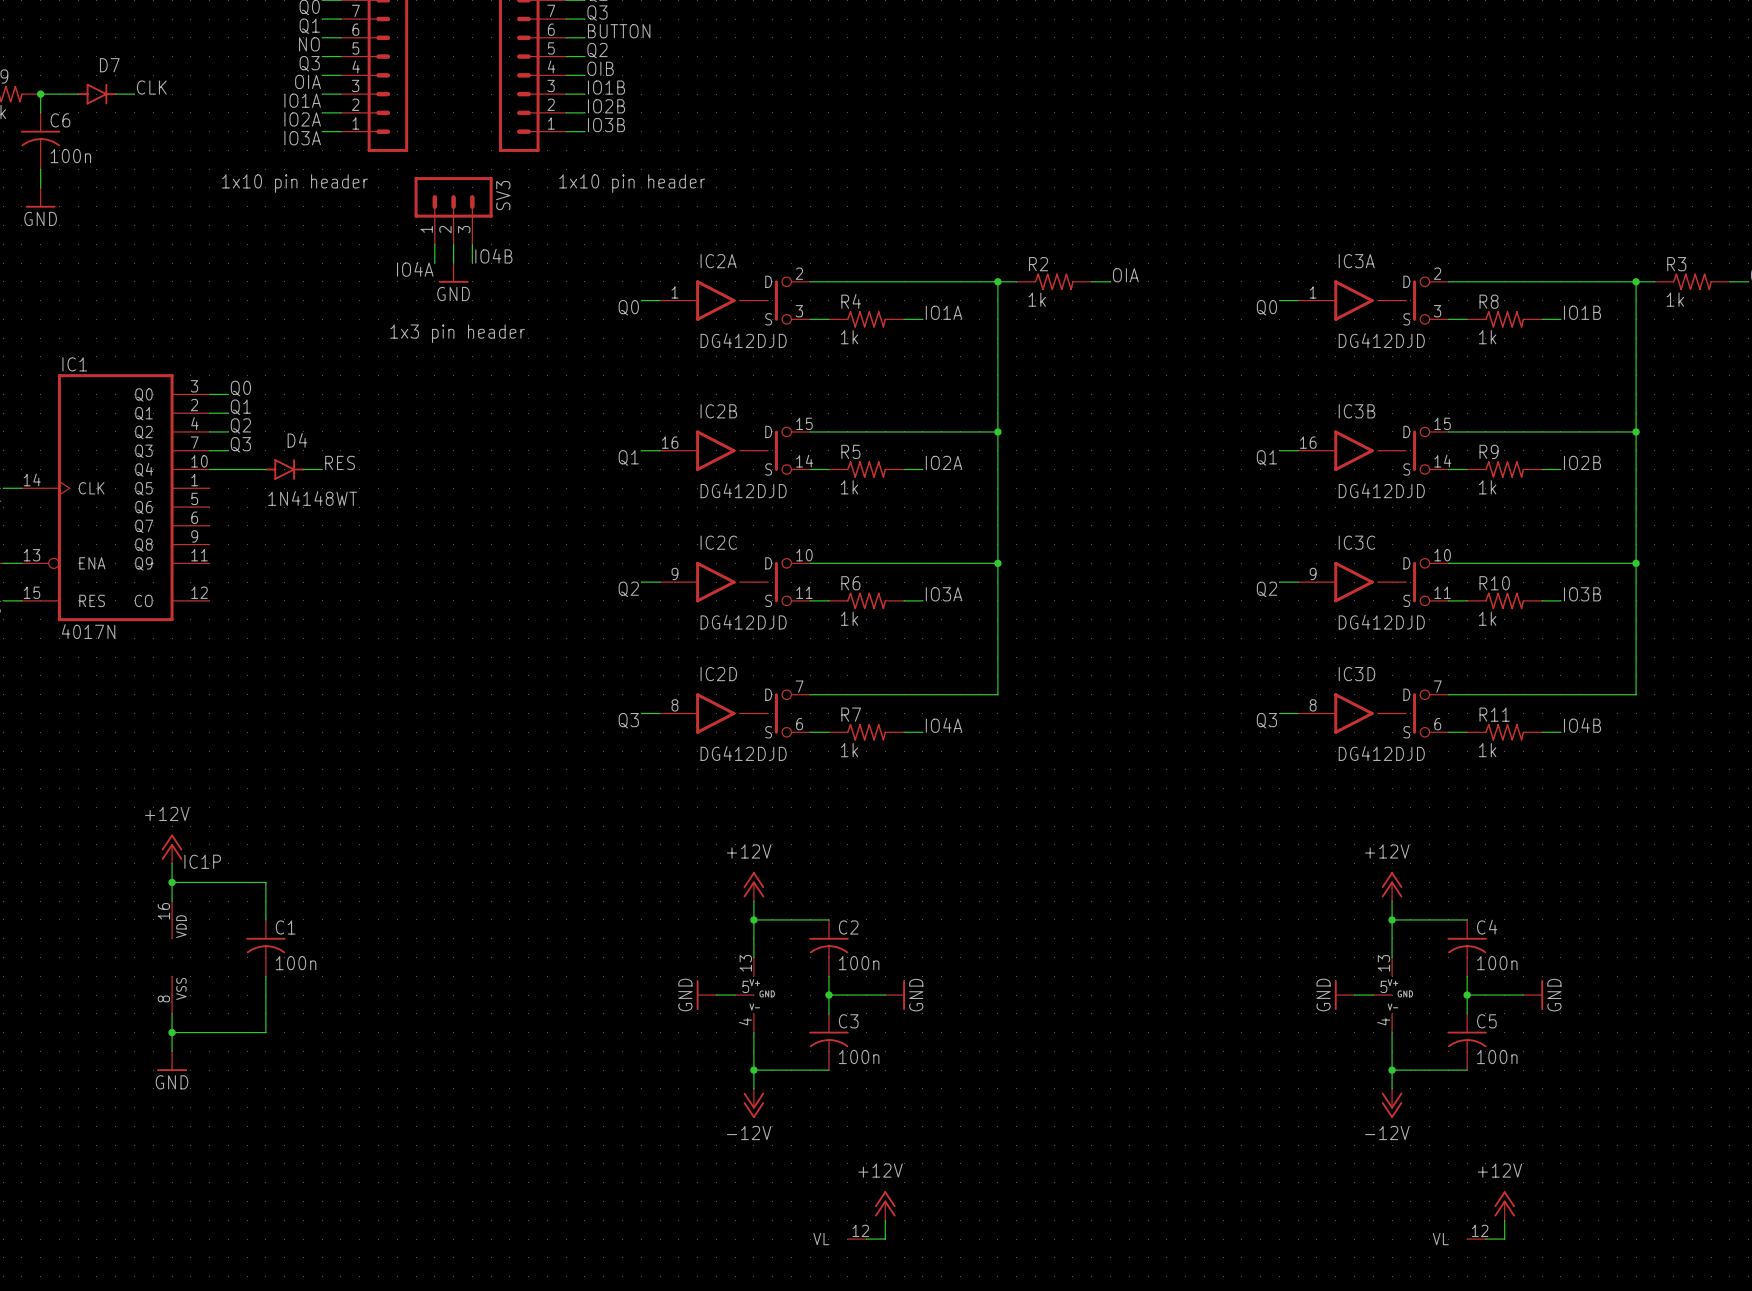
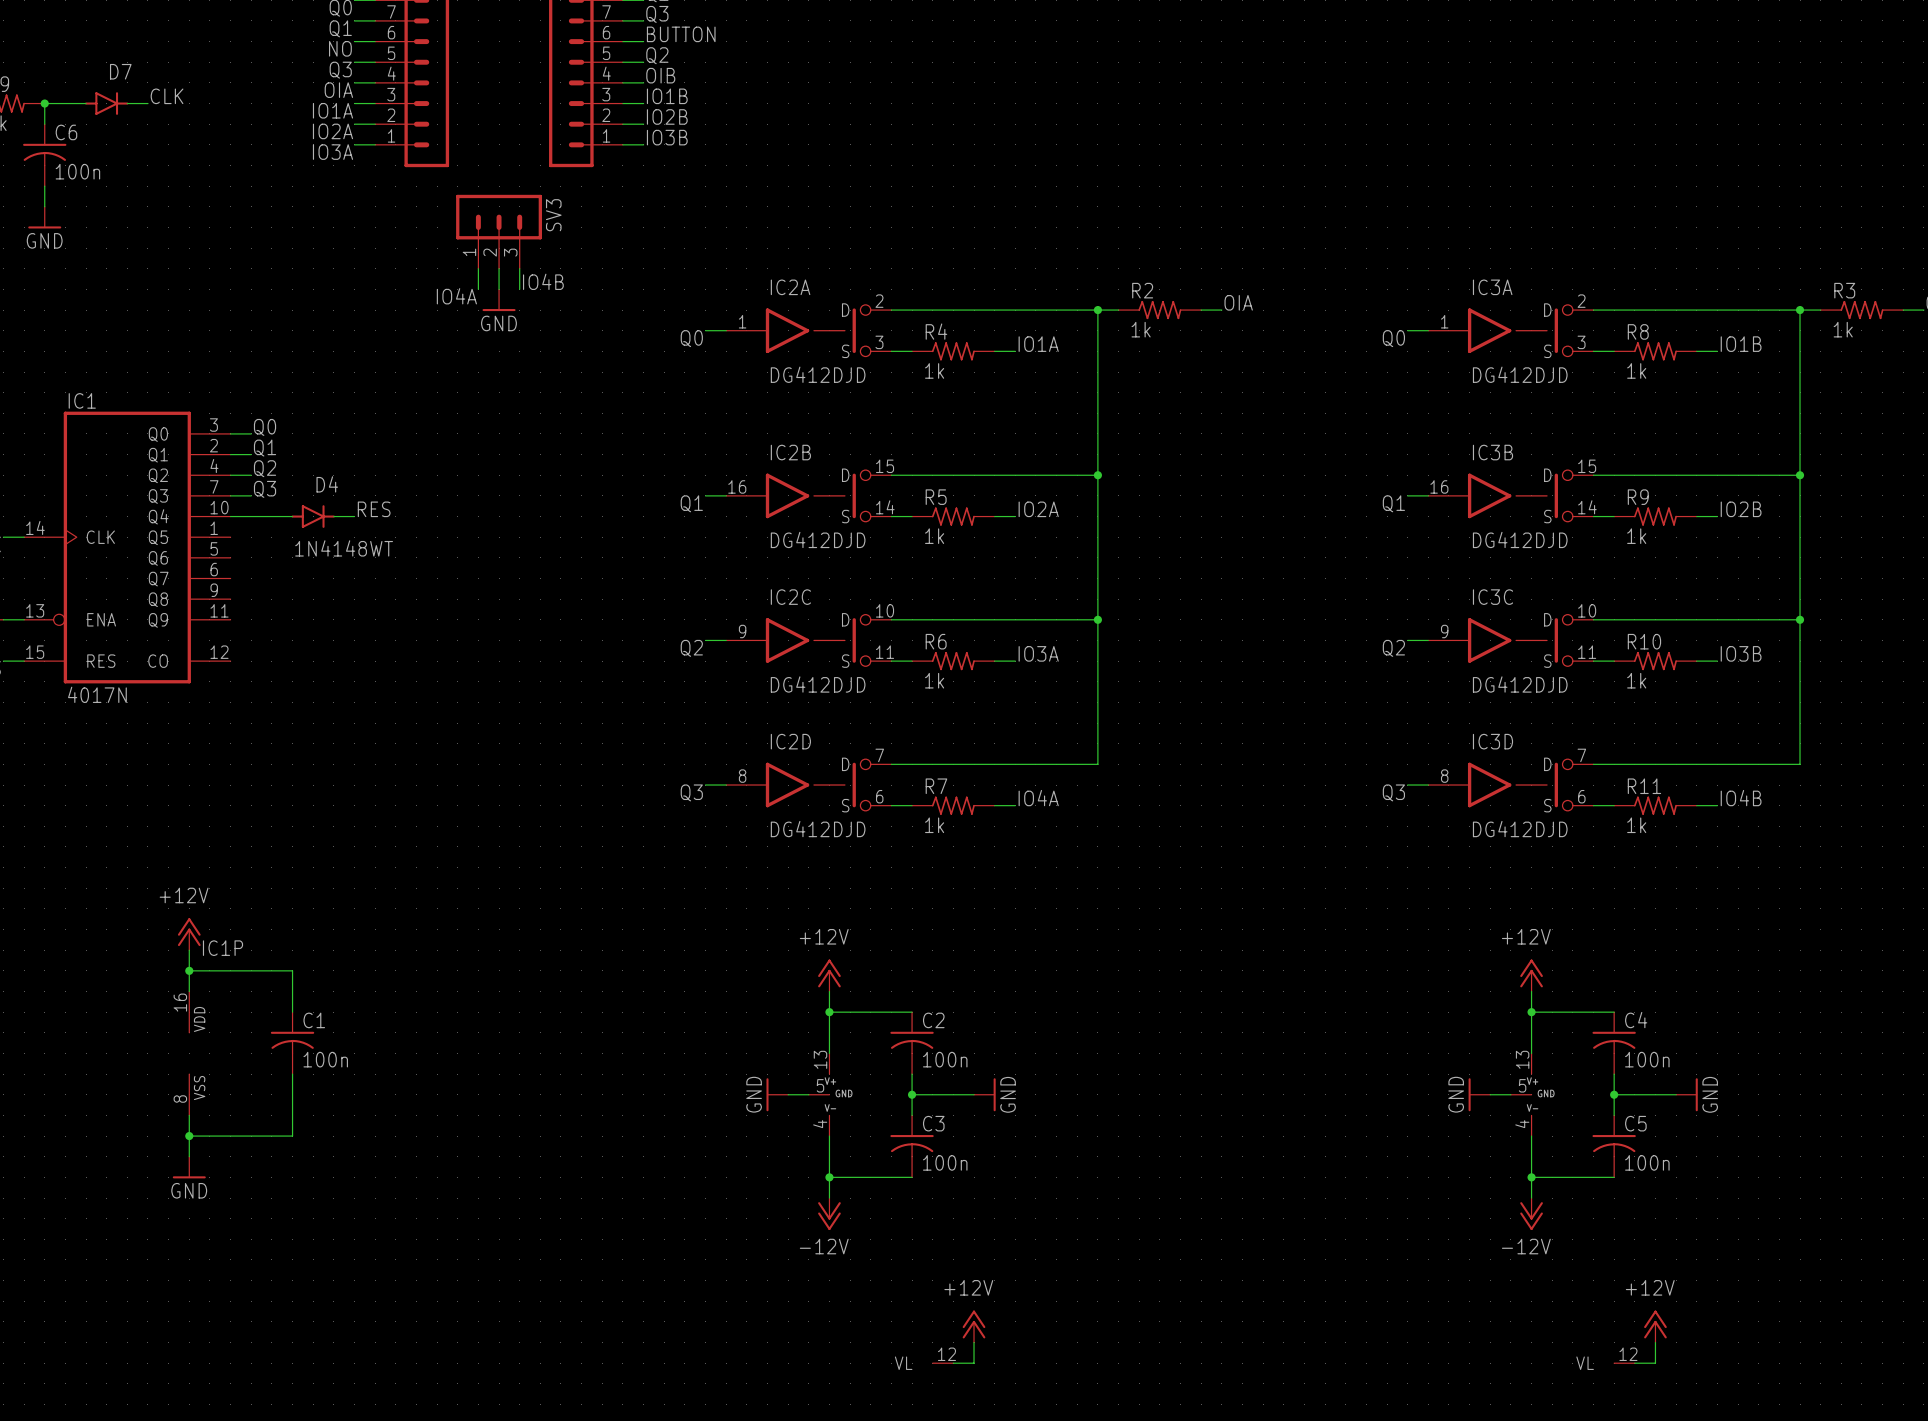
part value: 1x10 pin header (294, 183) -> none
part value: 1x10 pin header (632, 183) -> none
SV3 value: 1x3 pin header (457, 333) -> none

